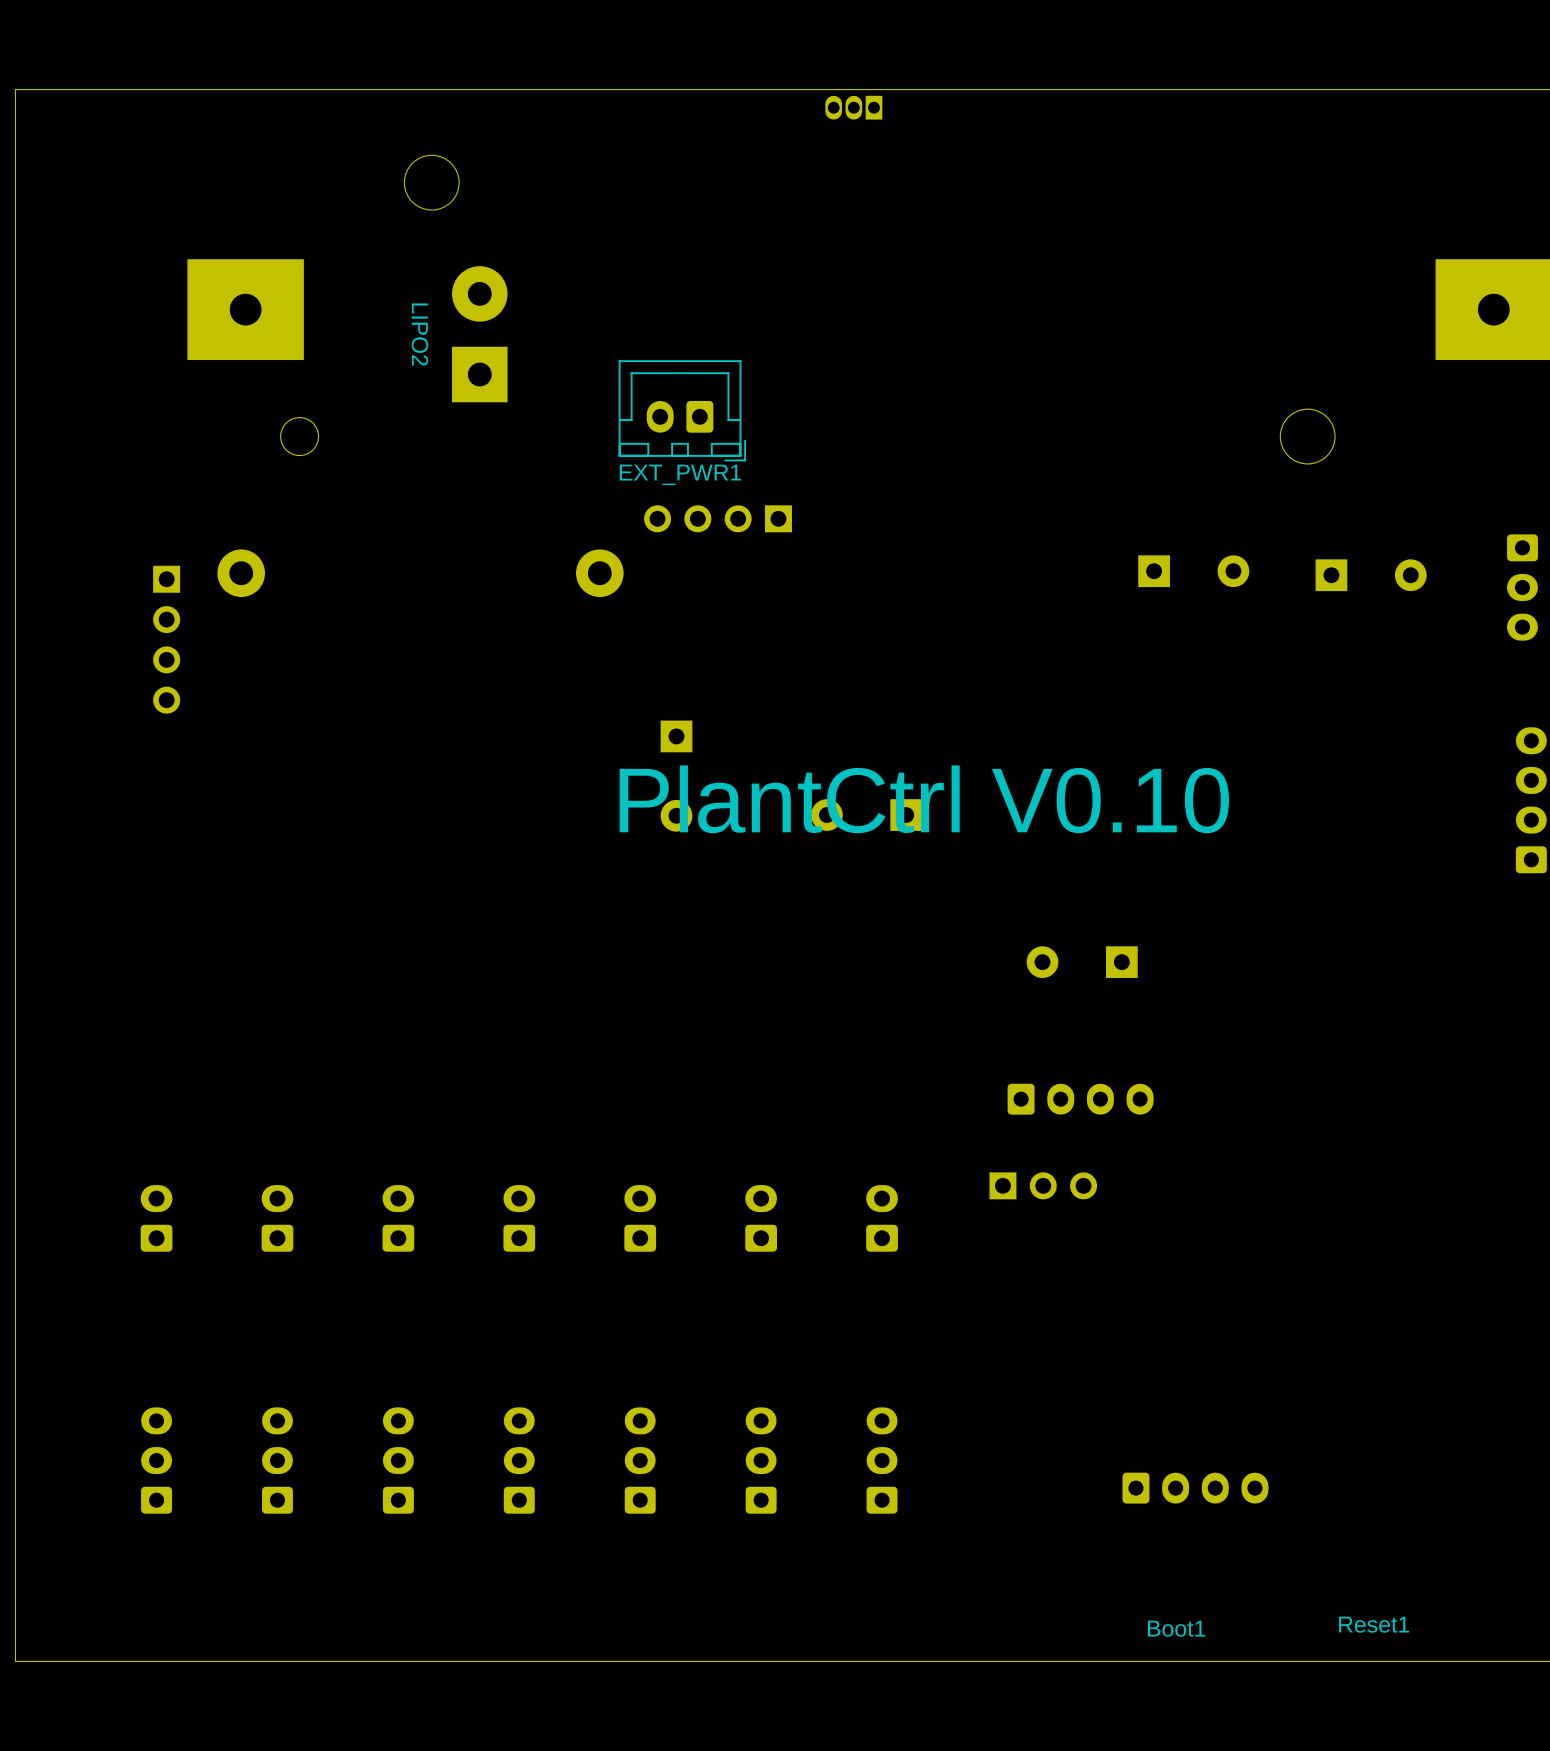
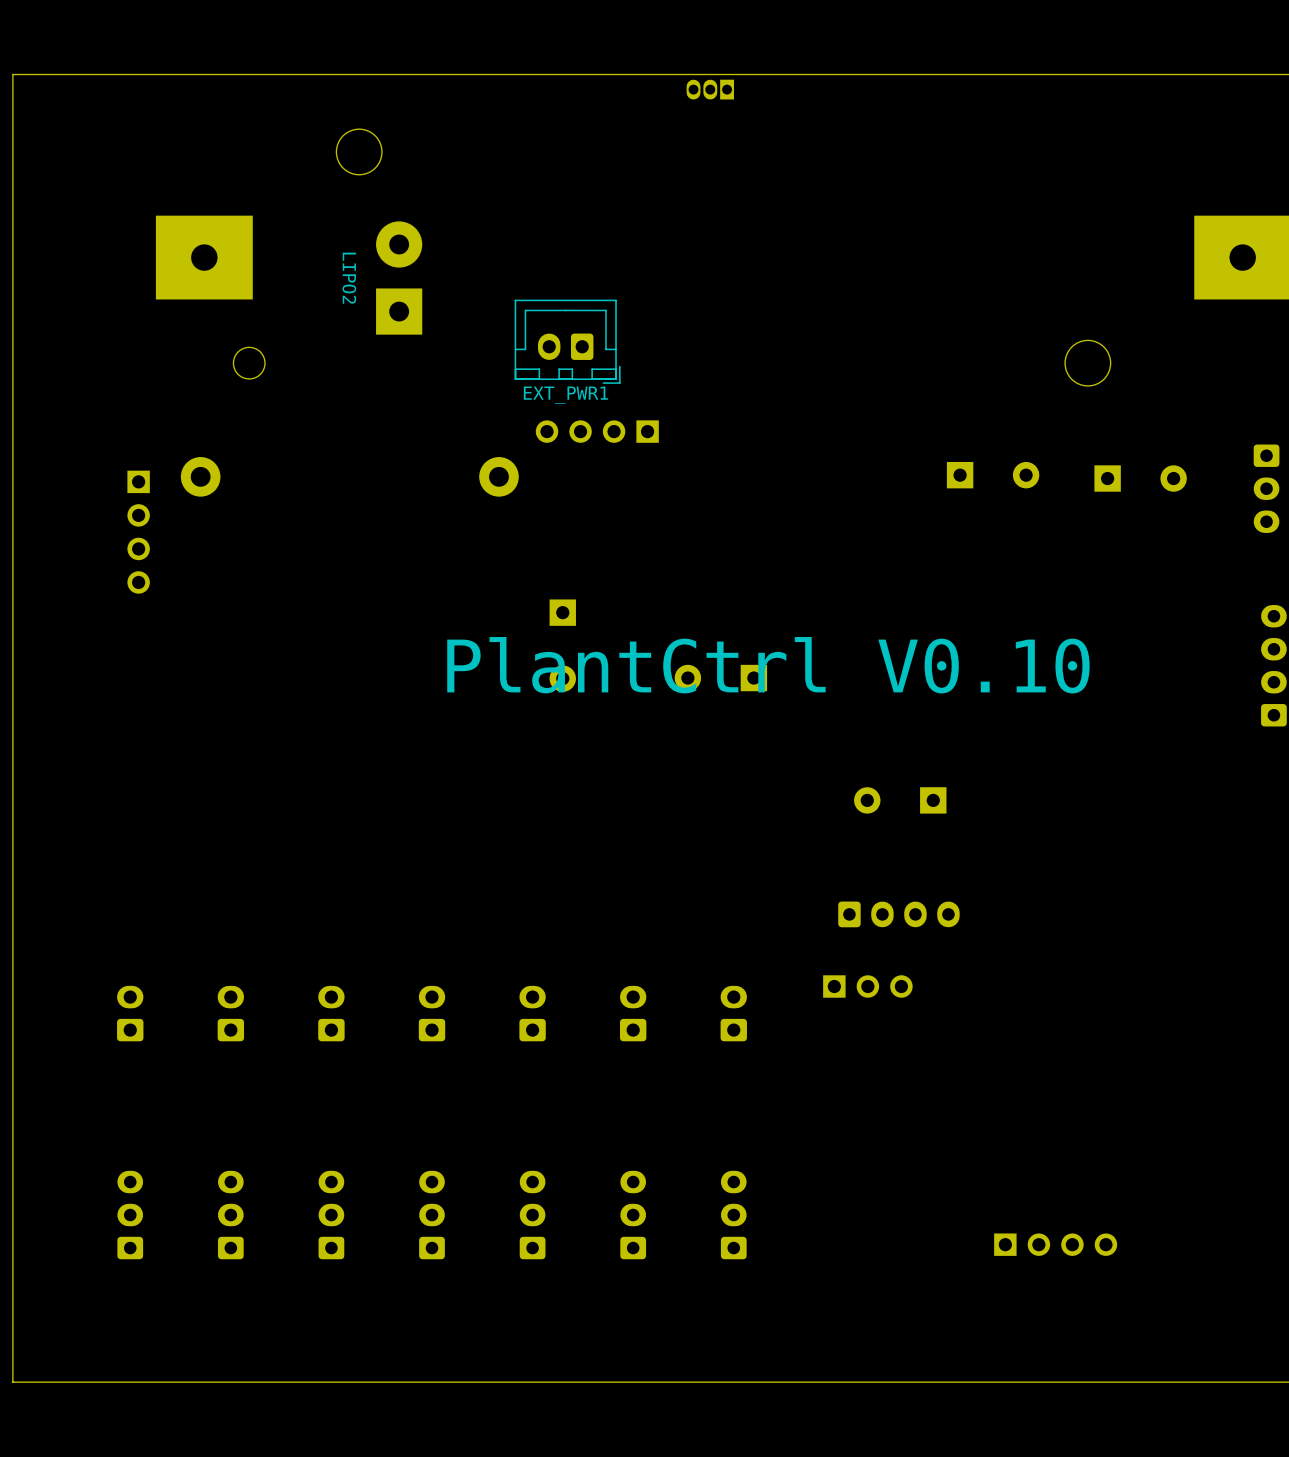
part: (1195, 1488) -> none
part: none -> (1055, 1244)
Reset1: (1374, 1624) -> none
Boot1: (1176, 1628) -> none

